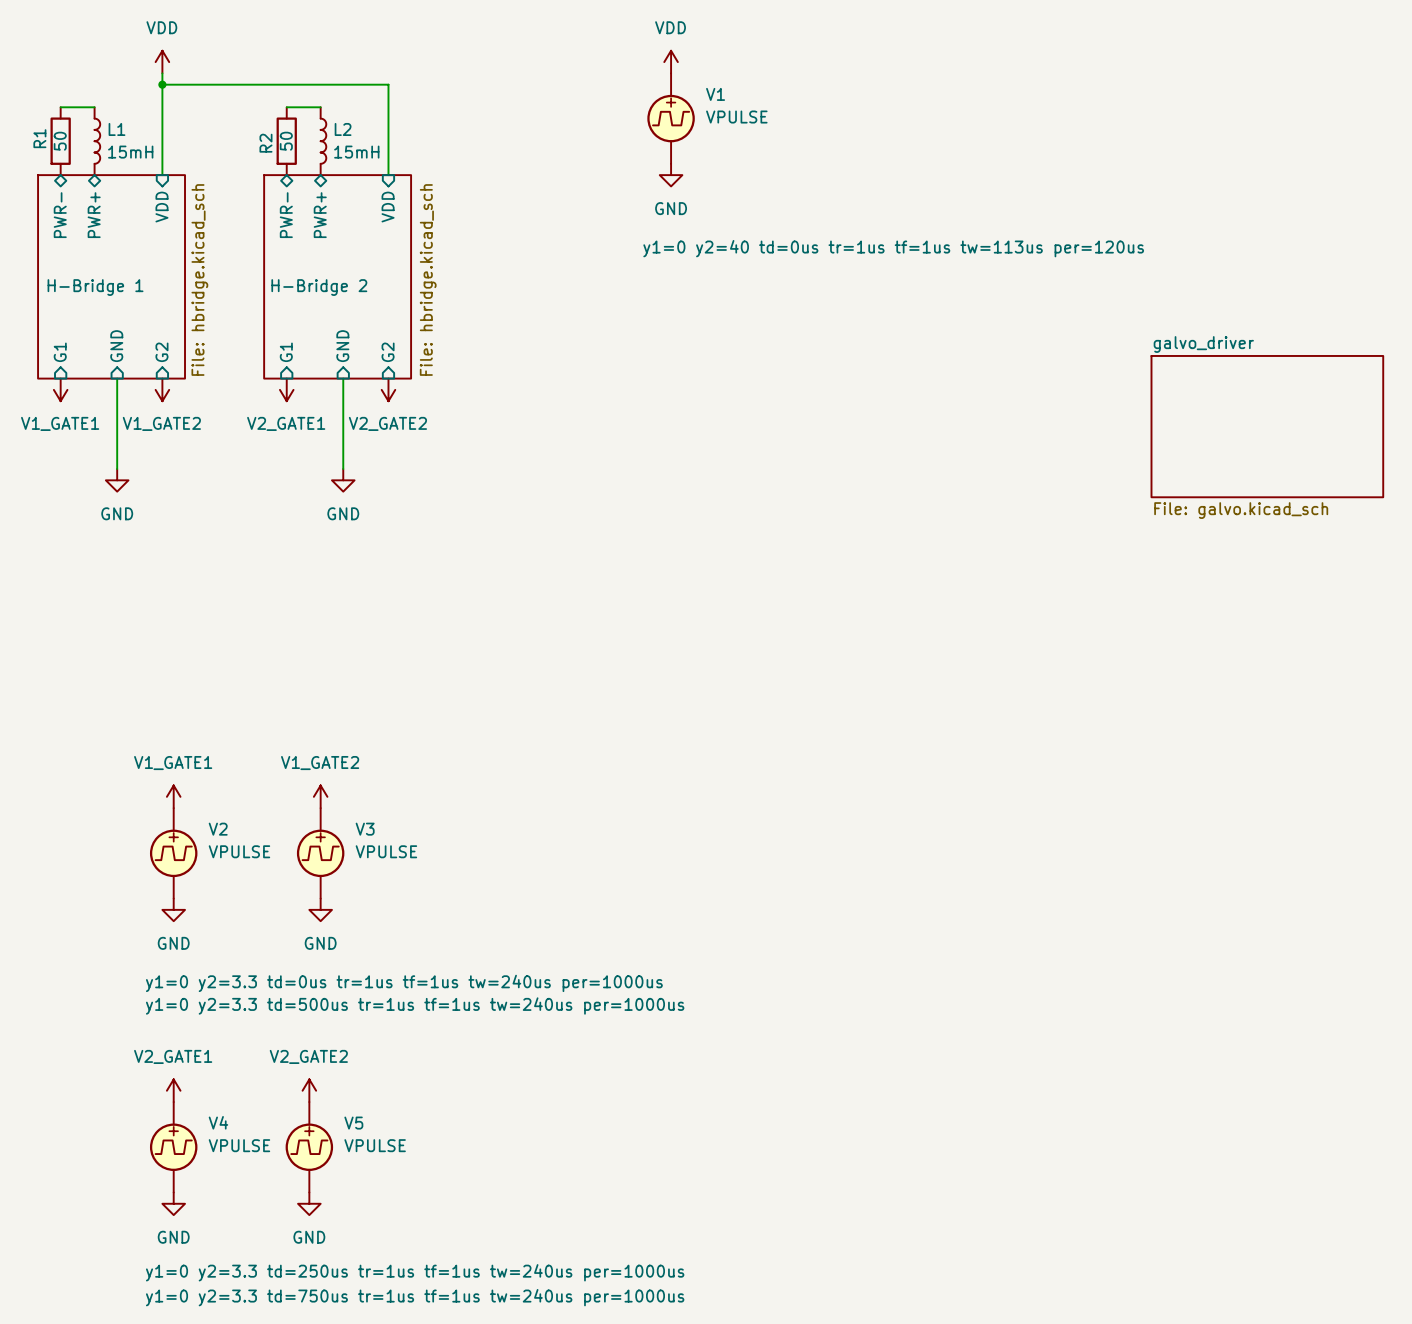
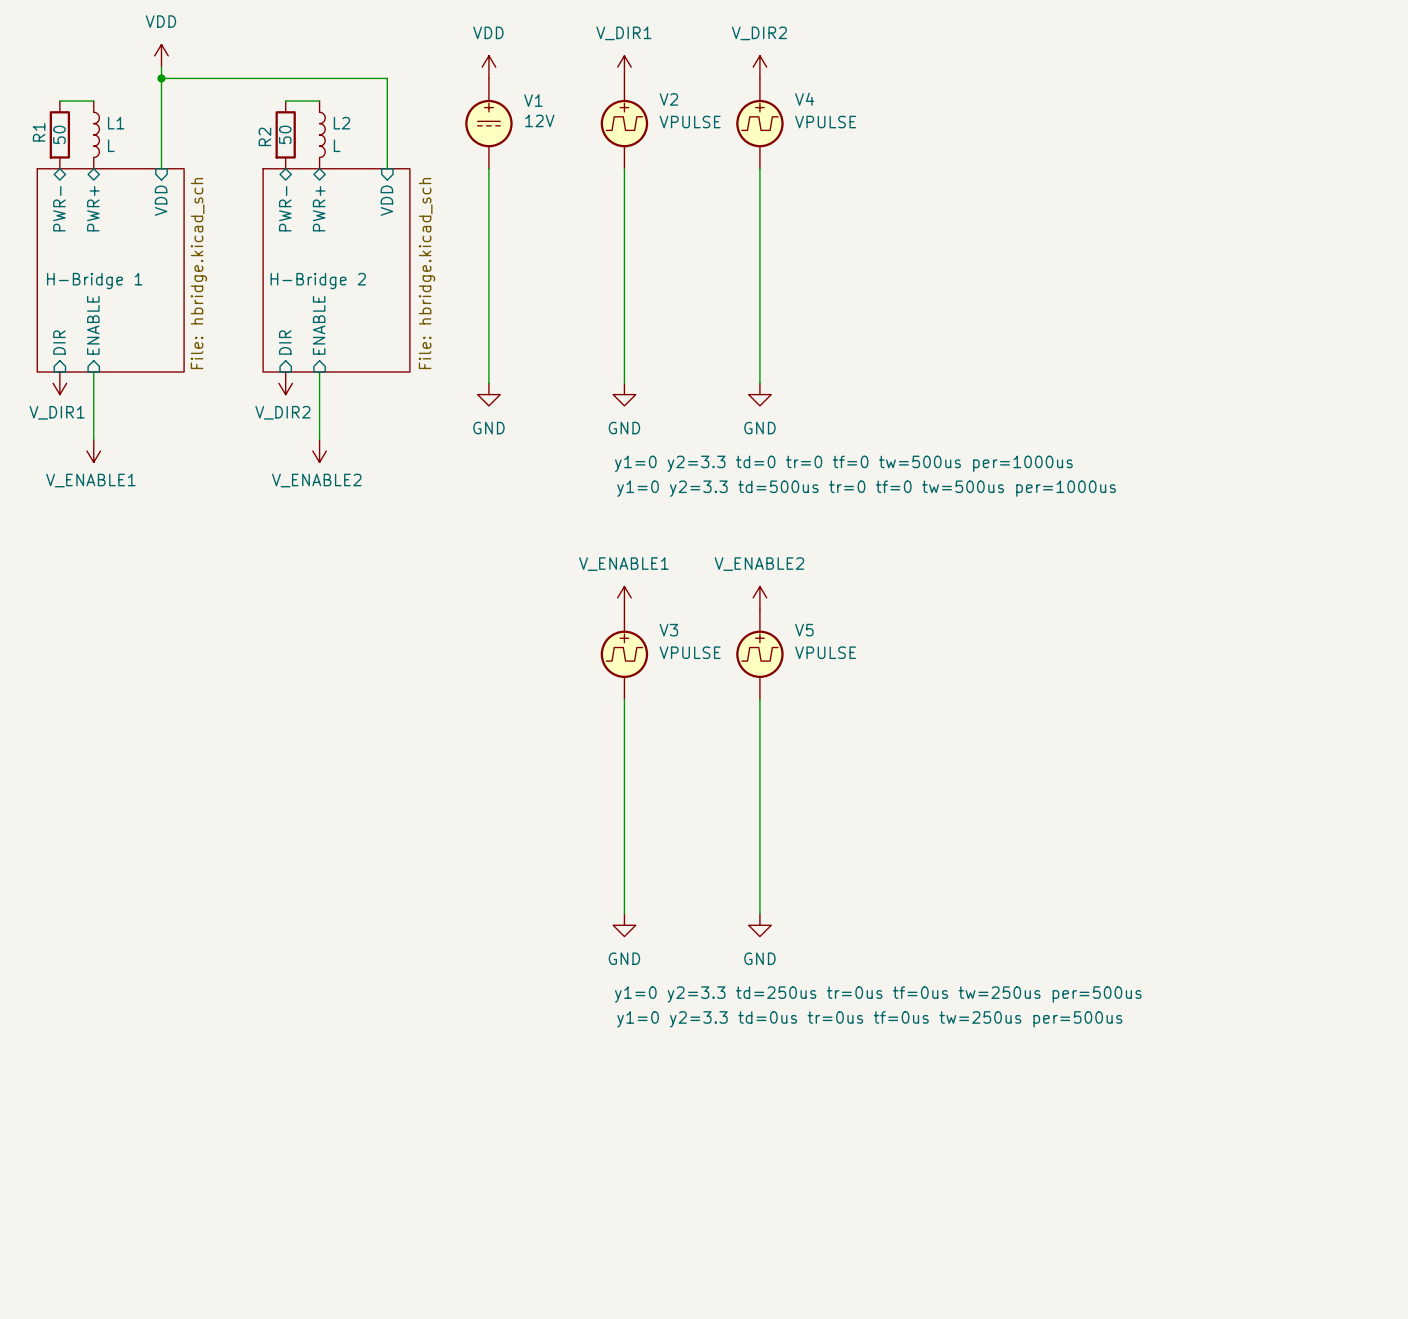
power symbol position: VDD (671, 62) -> VDD (488, 67)
power symbol: none -> V_DIR1 (624, 67)
V1 symbol: [647, 73, 695, 164] -> [465, 78, 513, 169]
power symbol: none -> V_DIR2 (759, 67)
V1 value: VPULSE (736, 117) -> 12V (539, 120)
L1 value: 15mH (130, 152) -> L (111, 145)
L2 value: 15mH (356, 152) -> L (337, 145)
wire: none -> (488, 168) (488, 383)
wire: none -> (624, 168) (624, 383)
power symbol: GND (671, 175) -> none
wire: none -> (759, 168) (759, 383)
V1 text: y1=0 y2=40 td=0us tr=1us tf=1us tw=113us per=120us (893, 248) -> none
sheet pin: none -> ENABLE (93, 325)
sheet pin: none -> ENABLE (319, 325)
sheet pin: GND (116, 346) -> none
sheet pin: GND (342, 346) -> none
sheet pin: G1 (60, 352) -> DIR (59, 342)
sheet pin: G2 (161, 352) -> none
sheet pin: G1 (286, 352) -> DIR (285, 342)
sheet pin: G2 (388, 352) -> none
wire: none -> (93, 372) (93, 439)
wire: (117, 378) (117, 469) -> none
wire: none -> (319, 372) (319, 439)
wire: (343, 378) (343, 469) -> none
power symbol: V1_GATE1 (60, 389) -> V_DIR1 (59, 383)
power symbol: V1_GATE2 (162, 389) -> none
power symbol: V2_GATE1 (286, 389) -> V_DIR2 (285, 383)
power symbol: V2_GATE2 (388, 389) -> none
power symbol: none -> GND (488, 394)
power symbol: none -> GND (624, 394)
power symbol: none -> GND (759, 394)
sheet galvo_driver: File: galvo.kicad_sch (1267, 426) -> none
power symbol: none -> V_ENABLE1 (93, 451)
power symbol: none -> V_ENABLE2 (319, 451)
power symbol: GND (117, 480) -> none
power symbol: GND (343, 480) -> none
power symbol: none -> V_ENABLE1 (624, 597)
power symbol: none -> V_ENABLE2 (759, 597)
wire: none -> (624, 699) (624, 914)
wire: none -> (759, 699) (759, 914)
power symbol: V1_GATE1 (173, 796) -> none
power symbol: V1_GATE2 (320, 796) -> none
V2 position: (173, 853) -> (624, 123)
V3 position: (320, 853) -> (624, 654)
power symbol: GND (173, 909) -> none
power symbol: GND (320, 909) -> none
power symbol: none -> GND (624, 925)
power symbol: none -> GND (759, 925)
V2 text: y1=0 y2=3.3 td=0us tr=1us tf=1us tw=240us per=1000us (404, 983) -> y1=0 y2=3.3 td=500us tr=0 tf=0 tw=500us per=1000us (866, 488)
V3 text: y1=0 y2=3.3 td=500us tr=1us tf=1us tw=240us per=1000us (415, 1006) -> y1=0 y2=3.3 td=0us tr=0us tf=0us tw=250us per=500us (869, 1019)
power symbol: V2_GATE1 (173, 1090) -> none
power symbol: V2_GATE2 (309, 1090) -> none
V4 position: (173, 1147) -> (759, 123)
V5 position: (309, 1147) -> (759, 654)
power symbol: GND (173, 1203) -> none
power symbol: GND (309, 1203) -> none
V5 text: y1=0 y2=3.3 td=250us tr=1us tf=1us tw=240us per=1000us (415, 1272) -> y1=0 y2=3.3 td=250us tr=0us tf=0us tw=250us per=500us (878, 994)
V4 text: y1=0 y2=3.3 td=750us tr=1us tf=1us tw=240us per=1000us (415, 1297) -> y1=0 y2=3.3 td=0 tr=0 tf=0 tw=500us per=1000us (843, 463)

